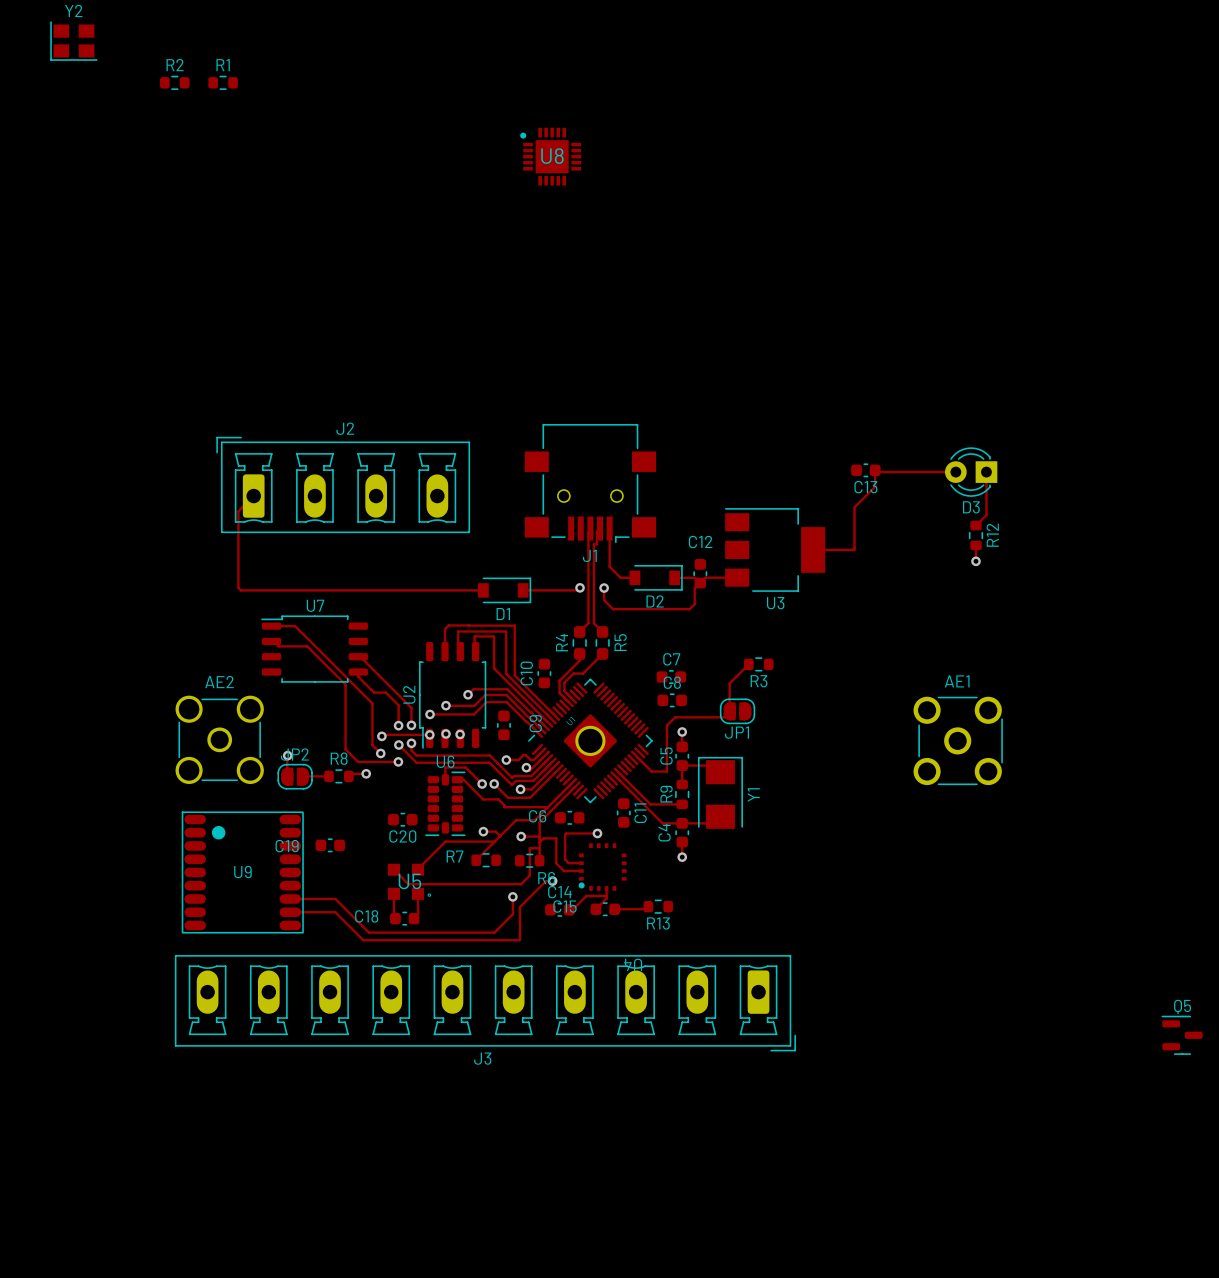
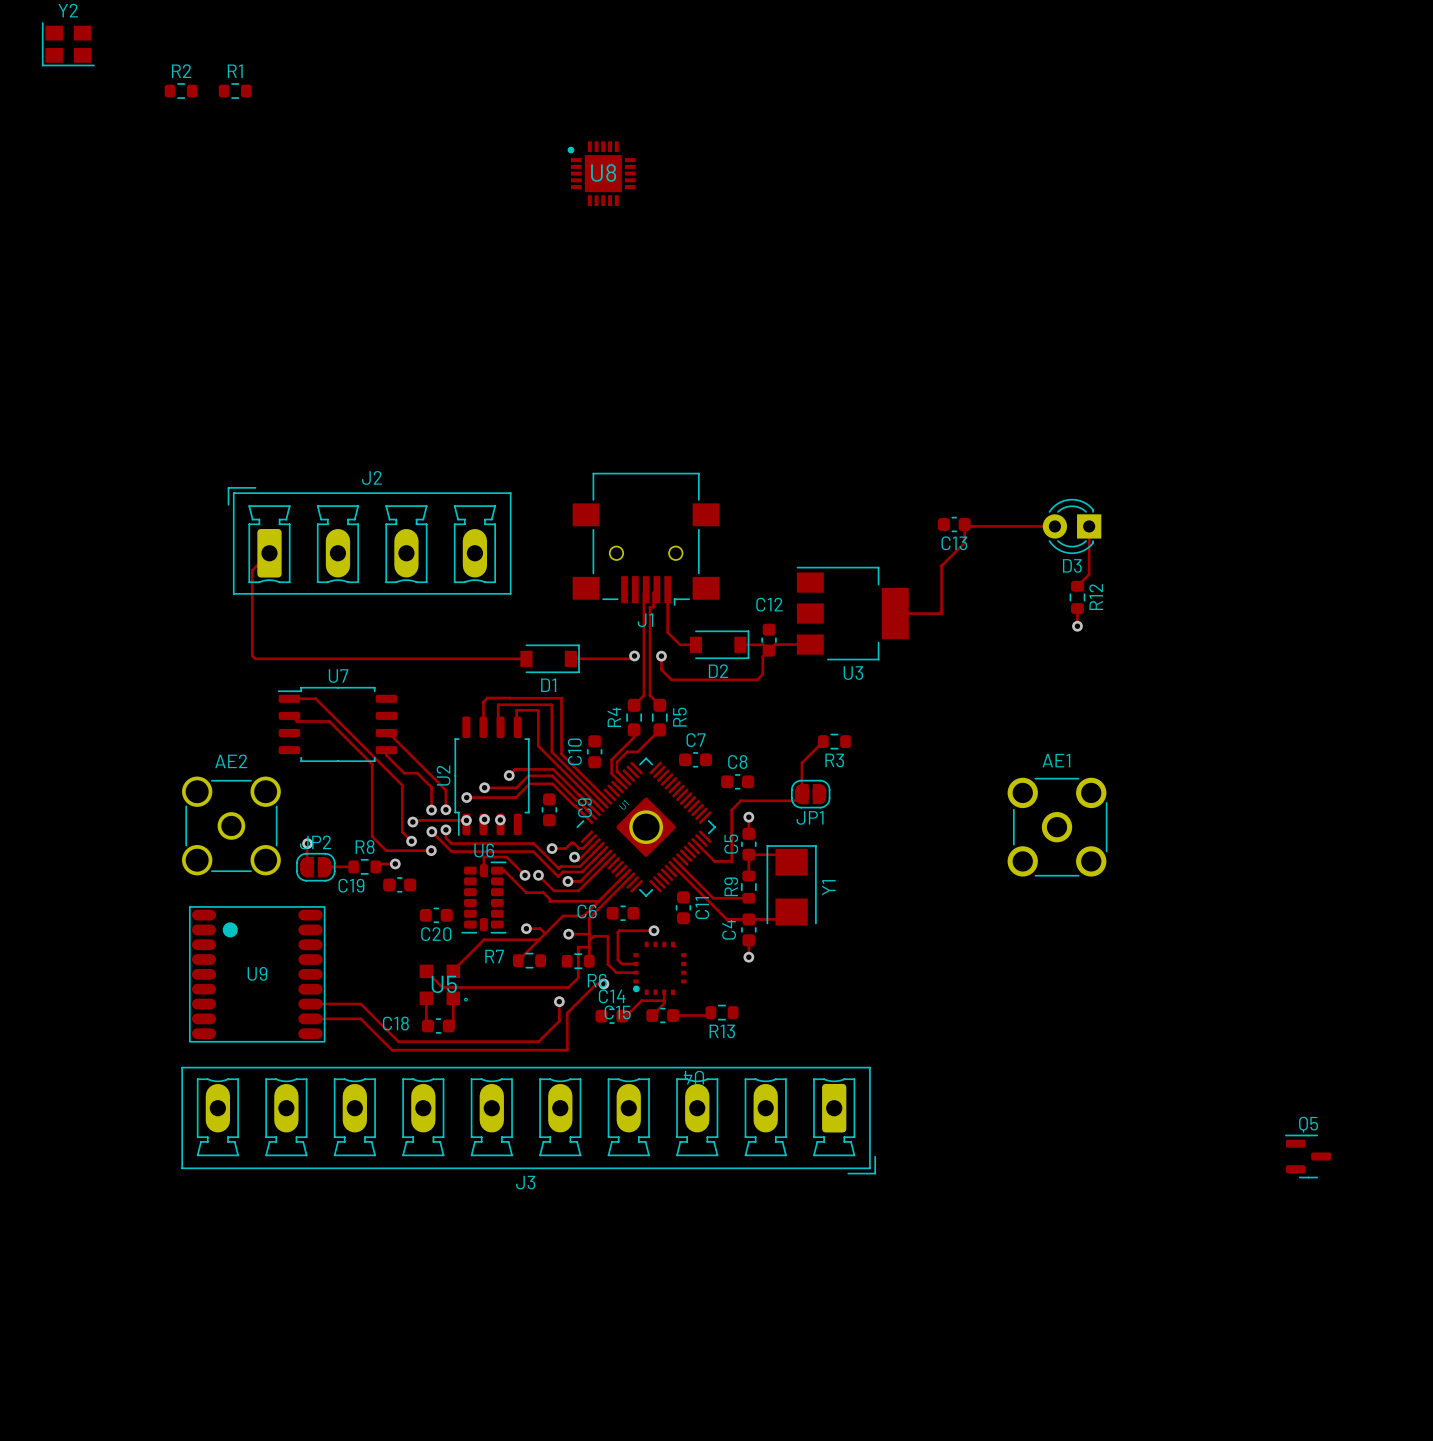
C7 position: (671, 677) -> (695, 759)
C19 position: (330, 845) -> (399, 884)

